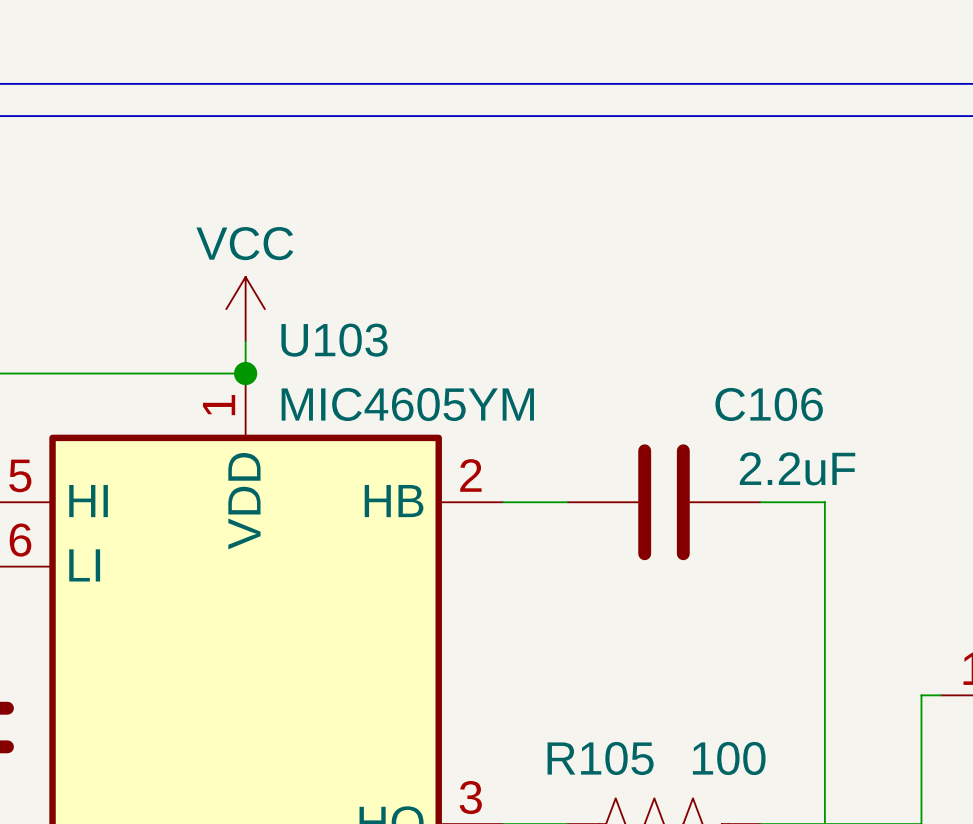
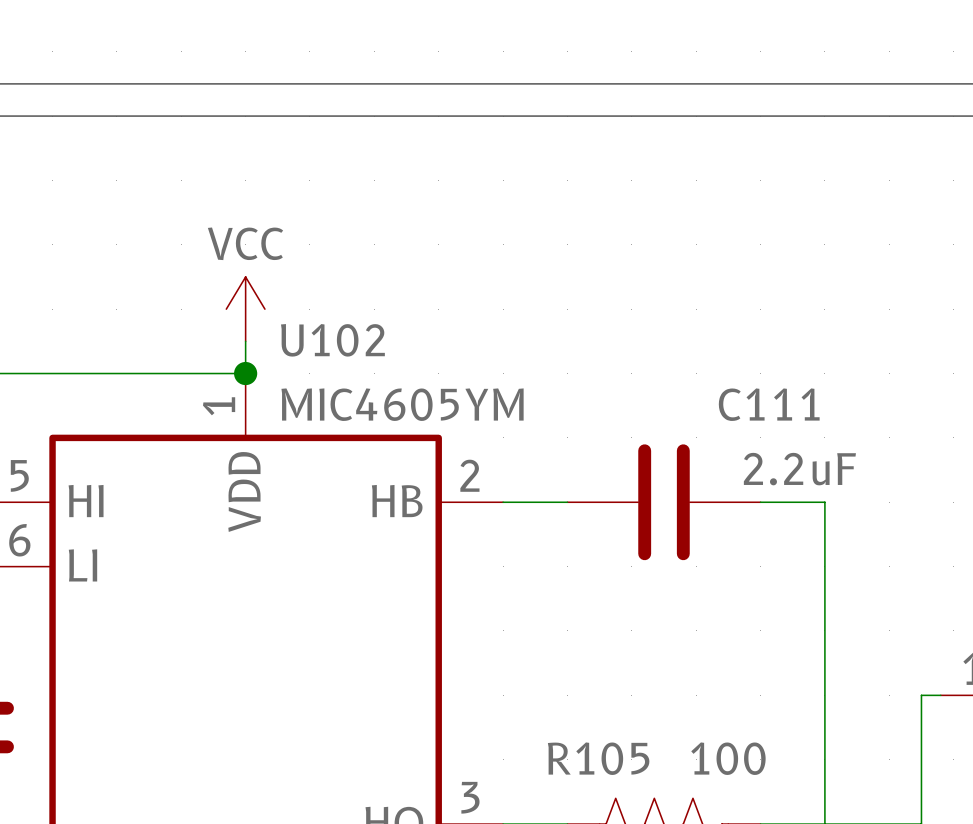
U103 name: U103 (334, 340) -> U102 (332, 340)
C106 name: C106 (769, 404) -> C111 (769, 404)

